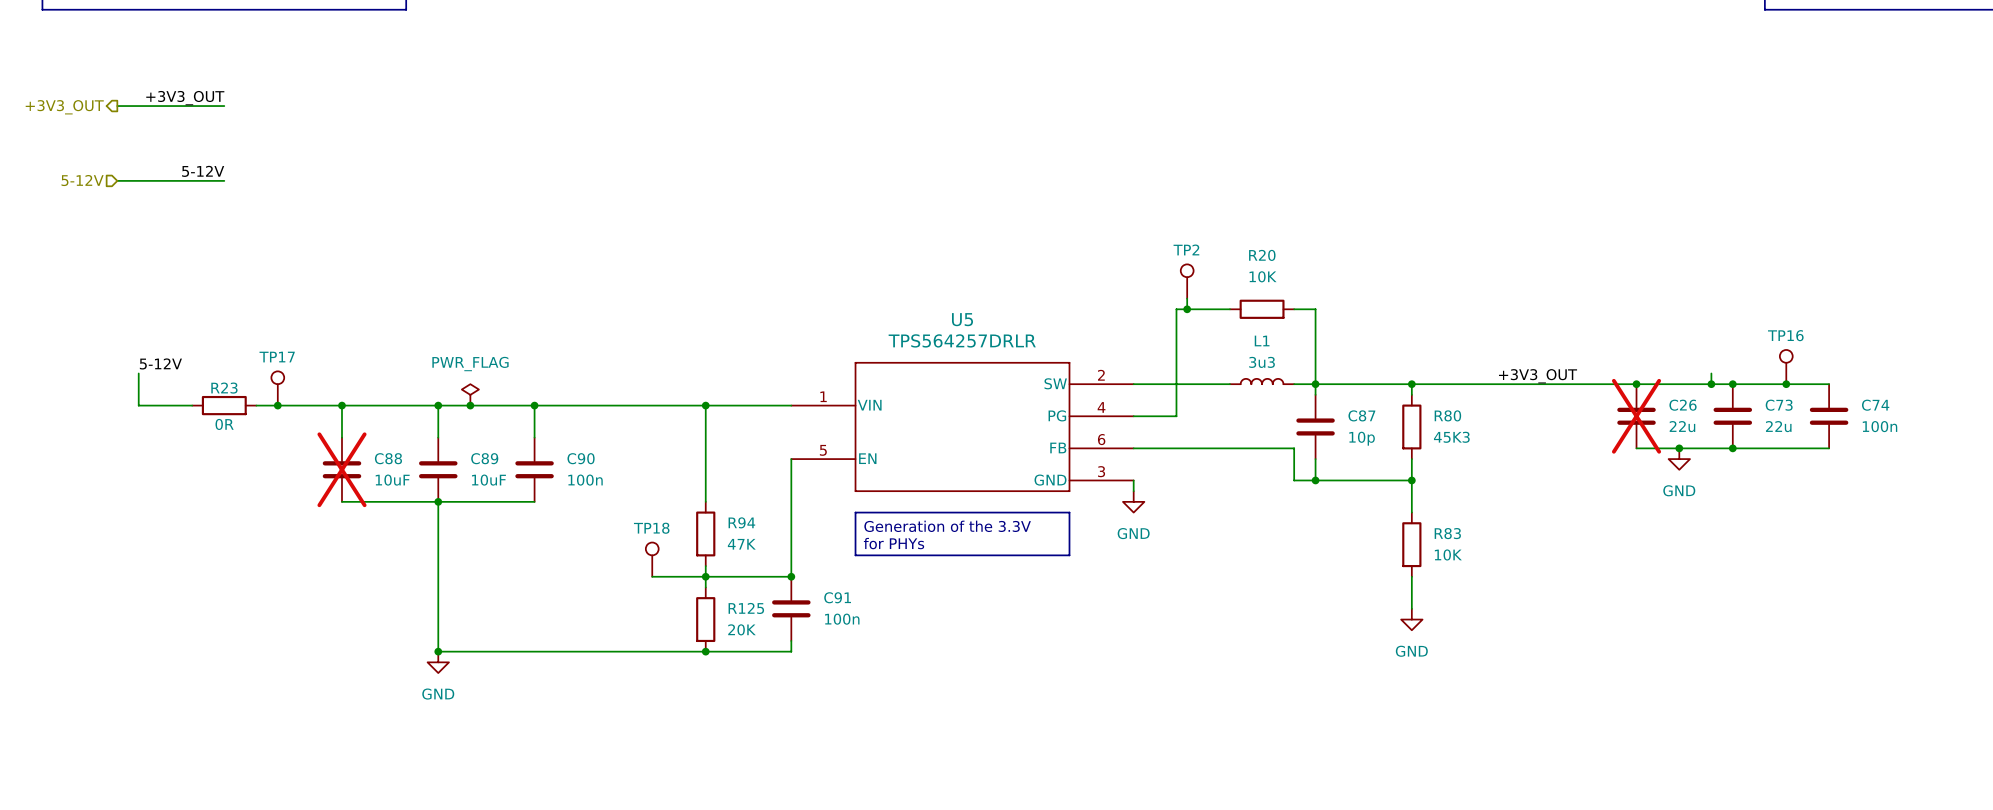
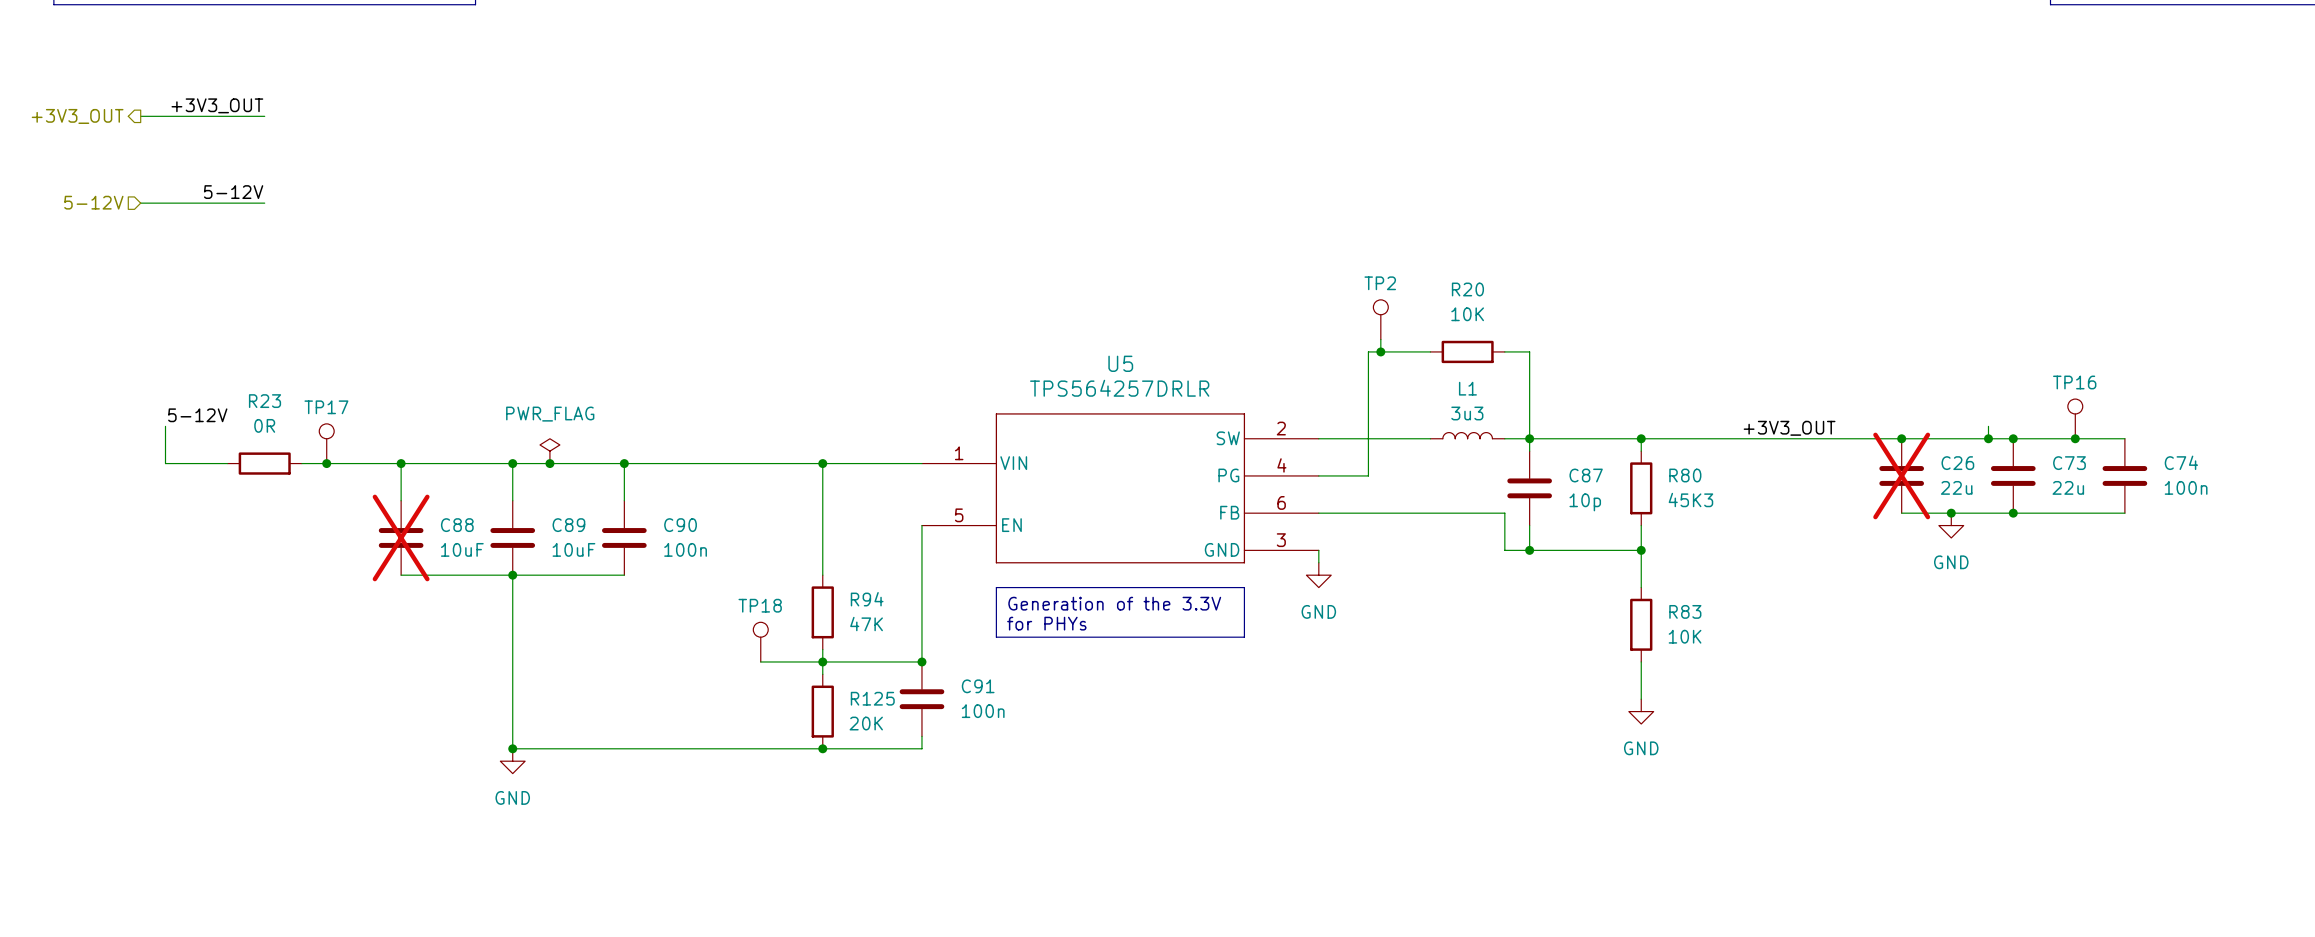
R23 name position: R23 (224, 388) -> R23 (265, 401)
R23 value position: 0R (224, 424) -> 0R (264, 425)

